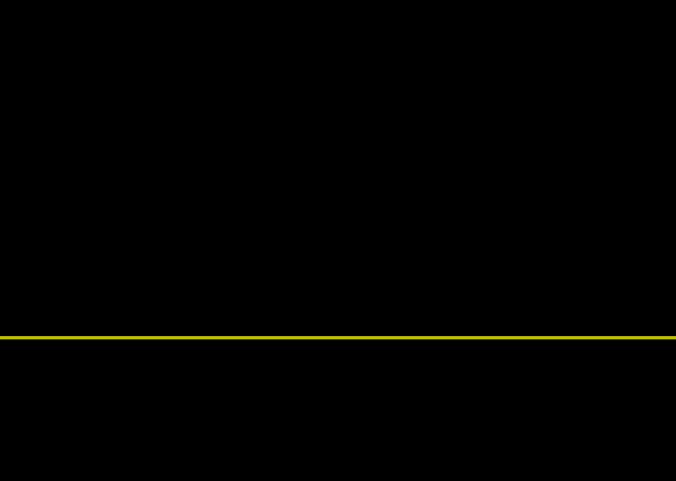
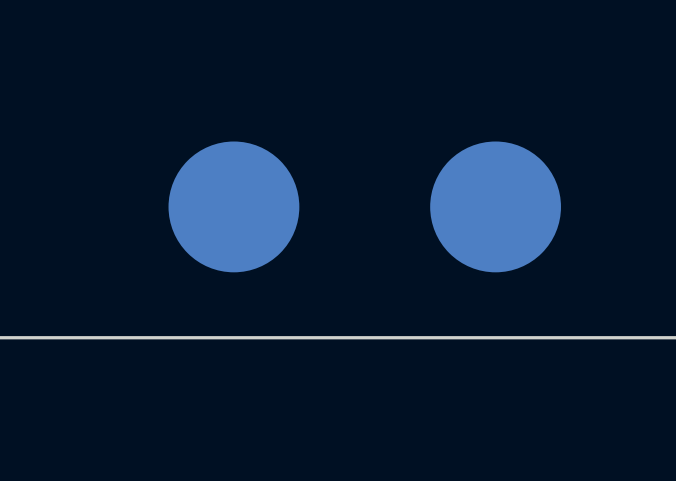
part: none -> (364, 206)

